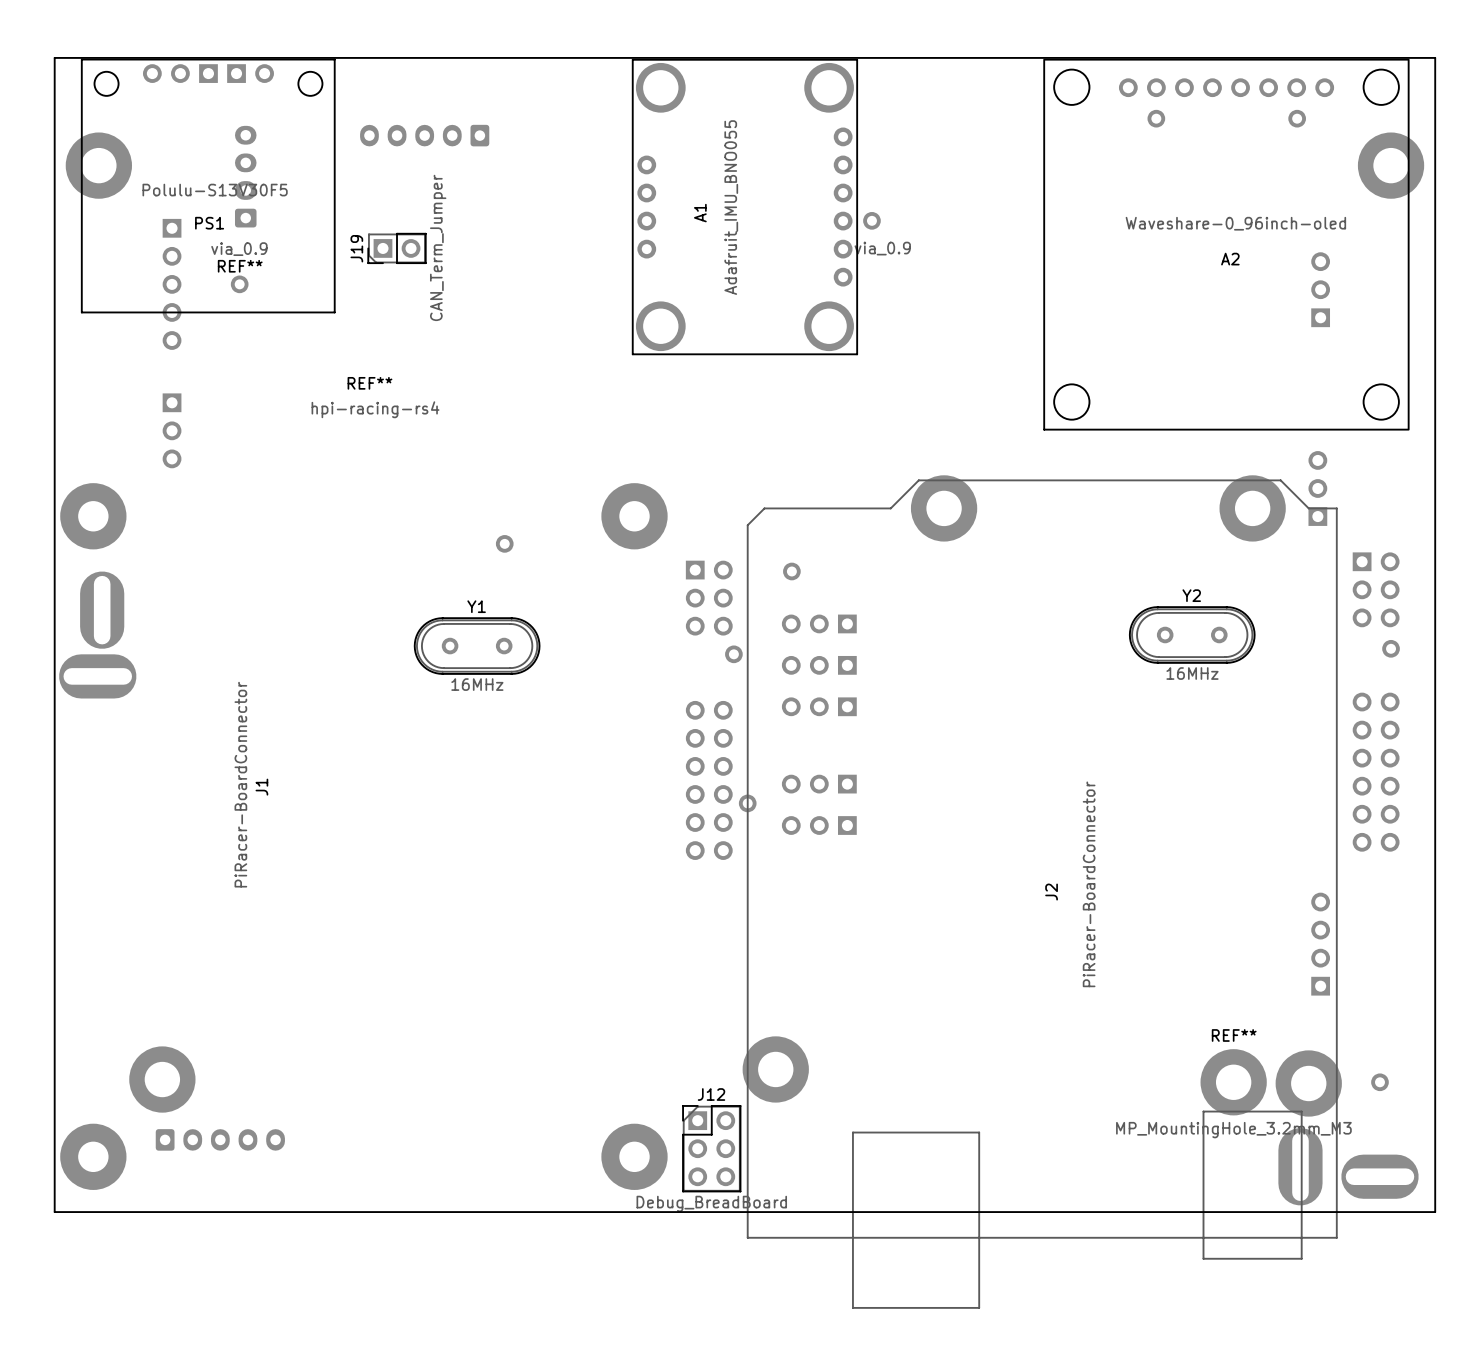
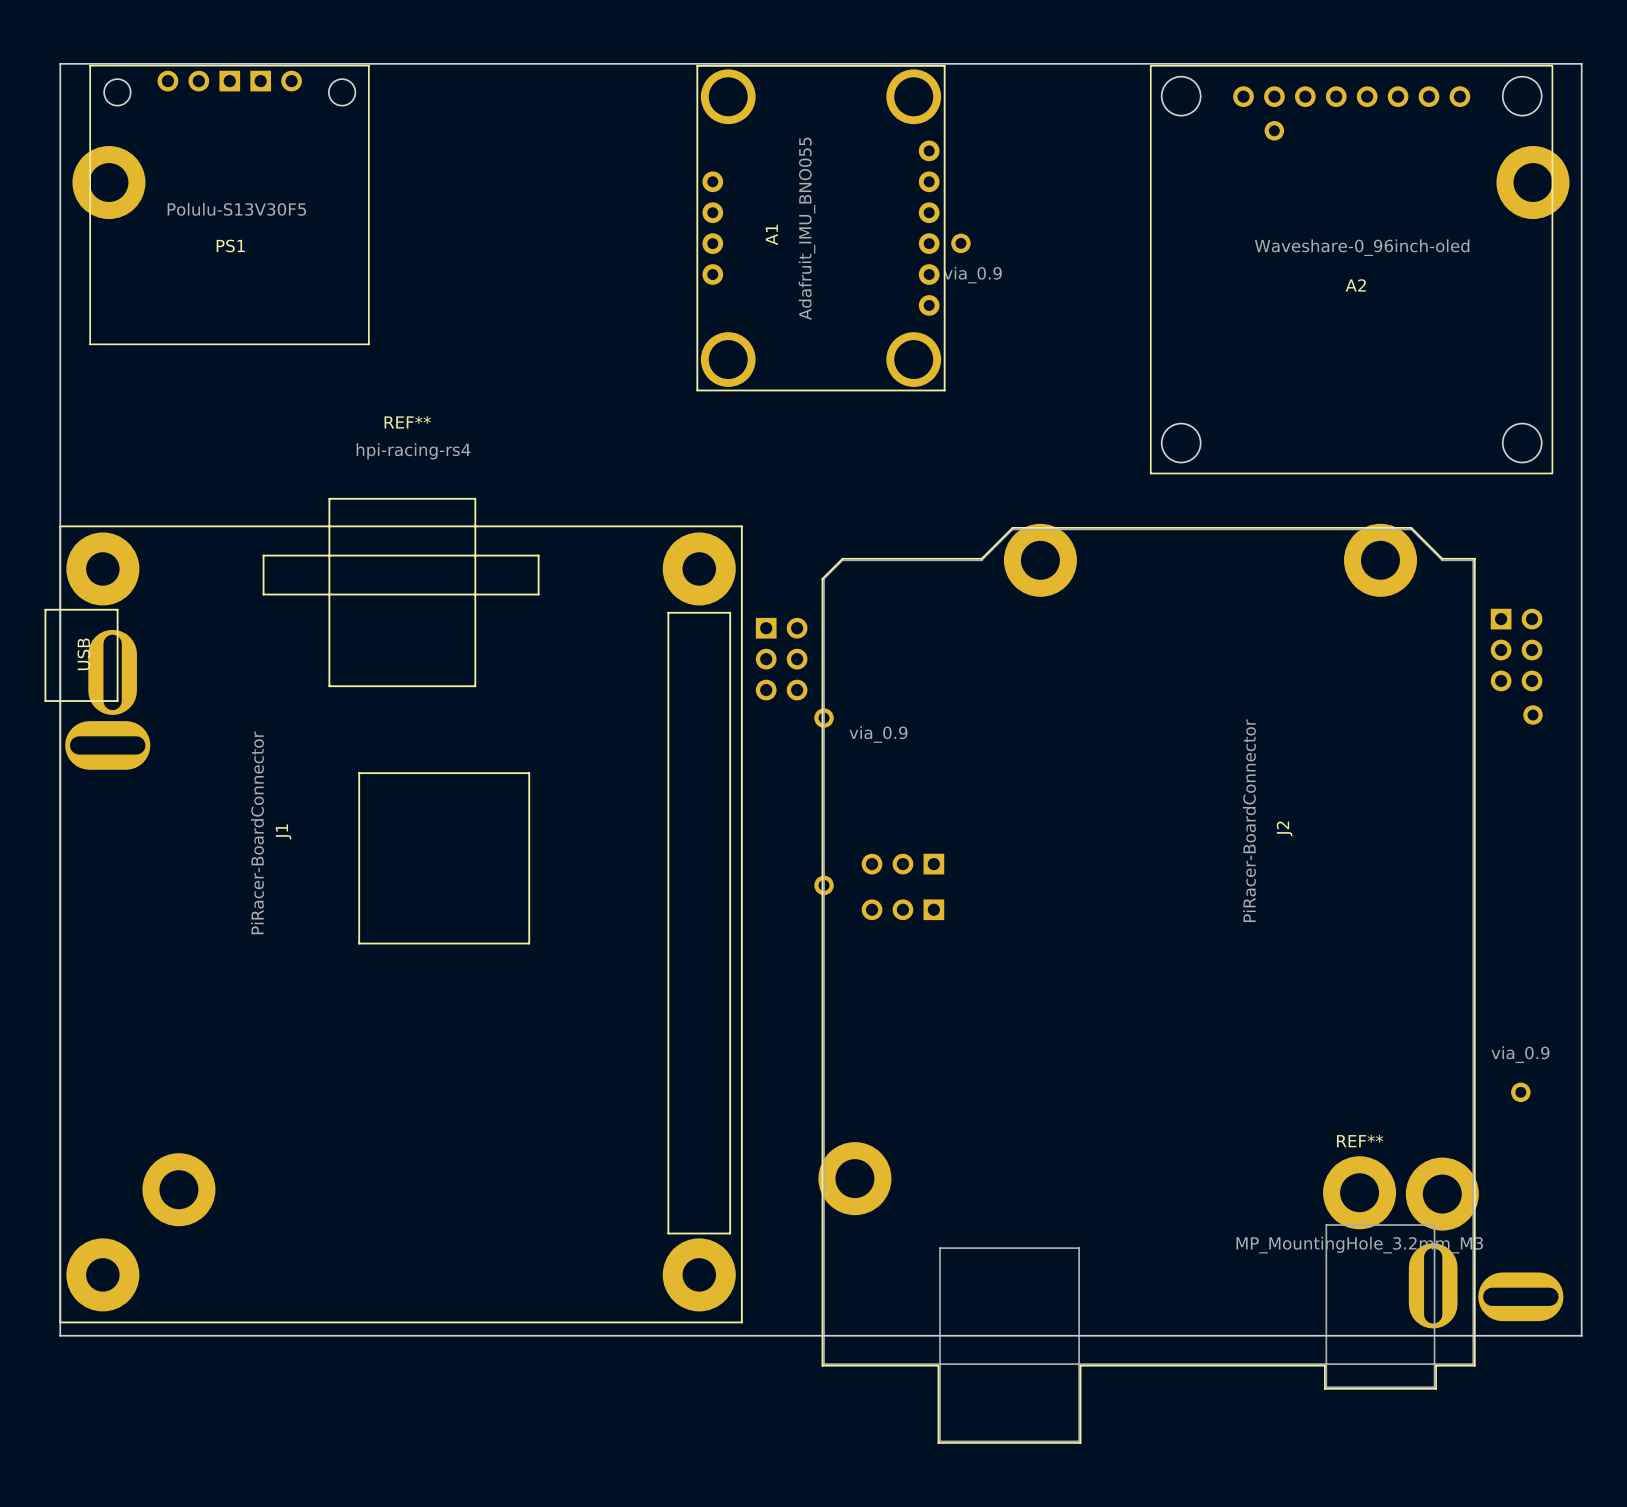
part: (1297, 118) -> none
part: (424, 135) -> none
part: (245, 176) -> none
J19: CAN_Term_Jumper (397, 248) -> none
part: (172, 284) -> none
REF**: via_0.9 (239, 284) -> none
part: (1320, 289) -> none
part: (172, 430) -> none
J2 footprint: [742, 475, 1400, 1309] -> [818, 523, 1543, 1444]
J1 footprint: [60, 483, 733, 1190] -> [44, 497, 808, 1324]
part: (1317, 488) -> none
part: (504, 543) -> none
part: (791, 571) -> none
part: (819, 623) -> none
Y2: 16MHz (1192, 634) -> none
Y1: 16MHz (477, 646) -> none
part: none -> via_0.9 (824, 718)
part: (733, 654) -> none
part: (819, 665) -> none
part: (819, 706) -> none
J1 name position: J1 (261, 787) -> J1 (283, 831)
J2 value position: PiRacer-BoardConnector (1089, 884) -> PiRacer-BoardConnector (1249, 820)
J2 name position: J2 (1051, 892) -> J2 (1284, 828)
part: (1320, 944) -> none
part: none -> via_0.9 (1520, 1092)
part: (1379, 1082) -> none
part: (220, 1139) -> none
J12: Debug_BreadBoard (711, 1148) -> none

